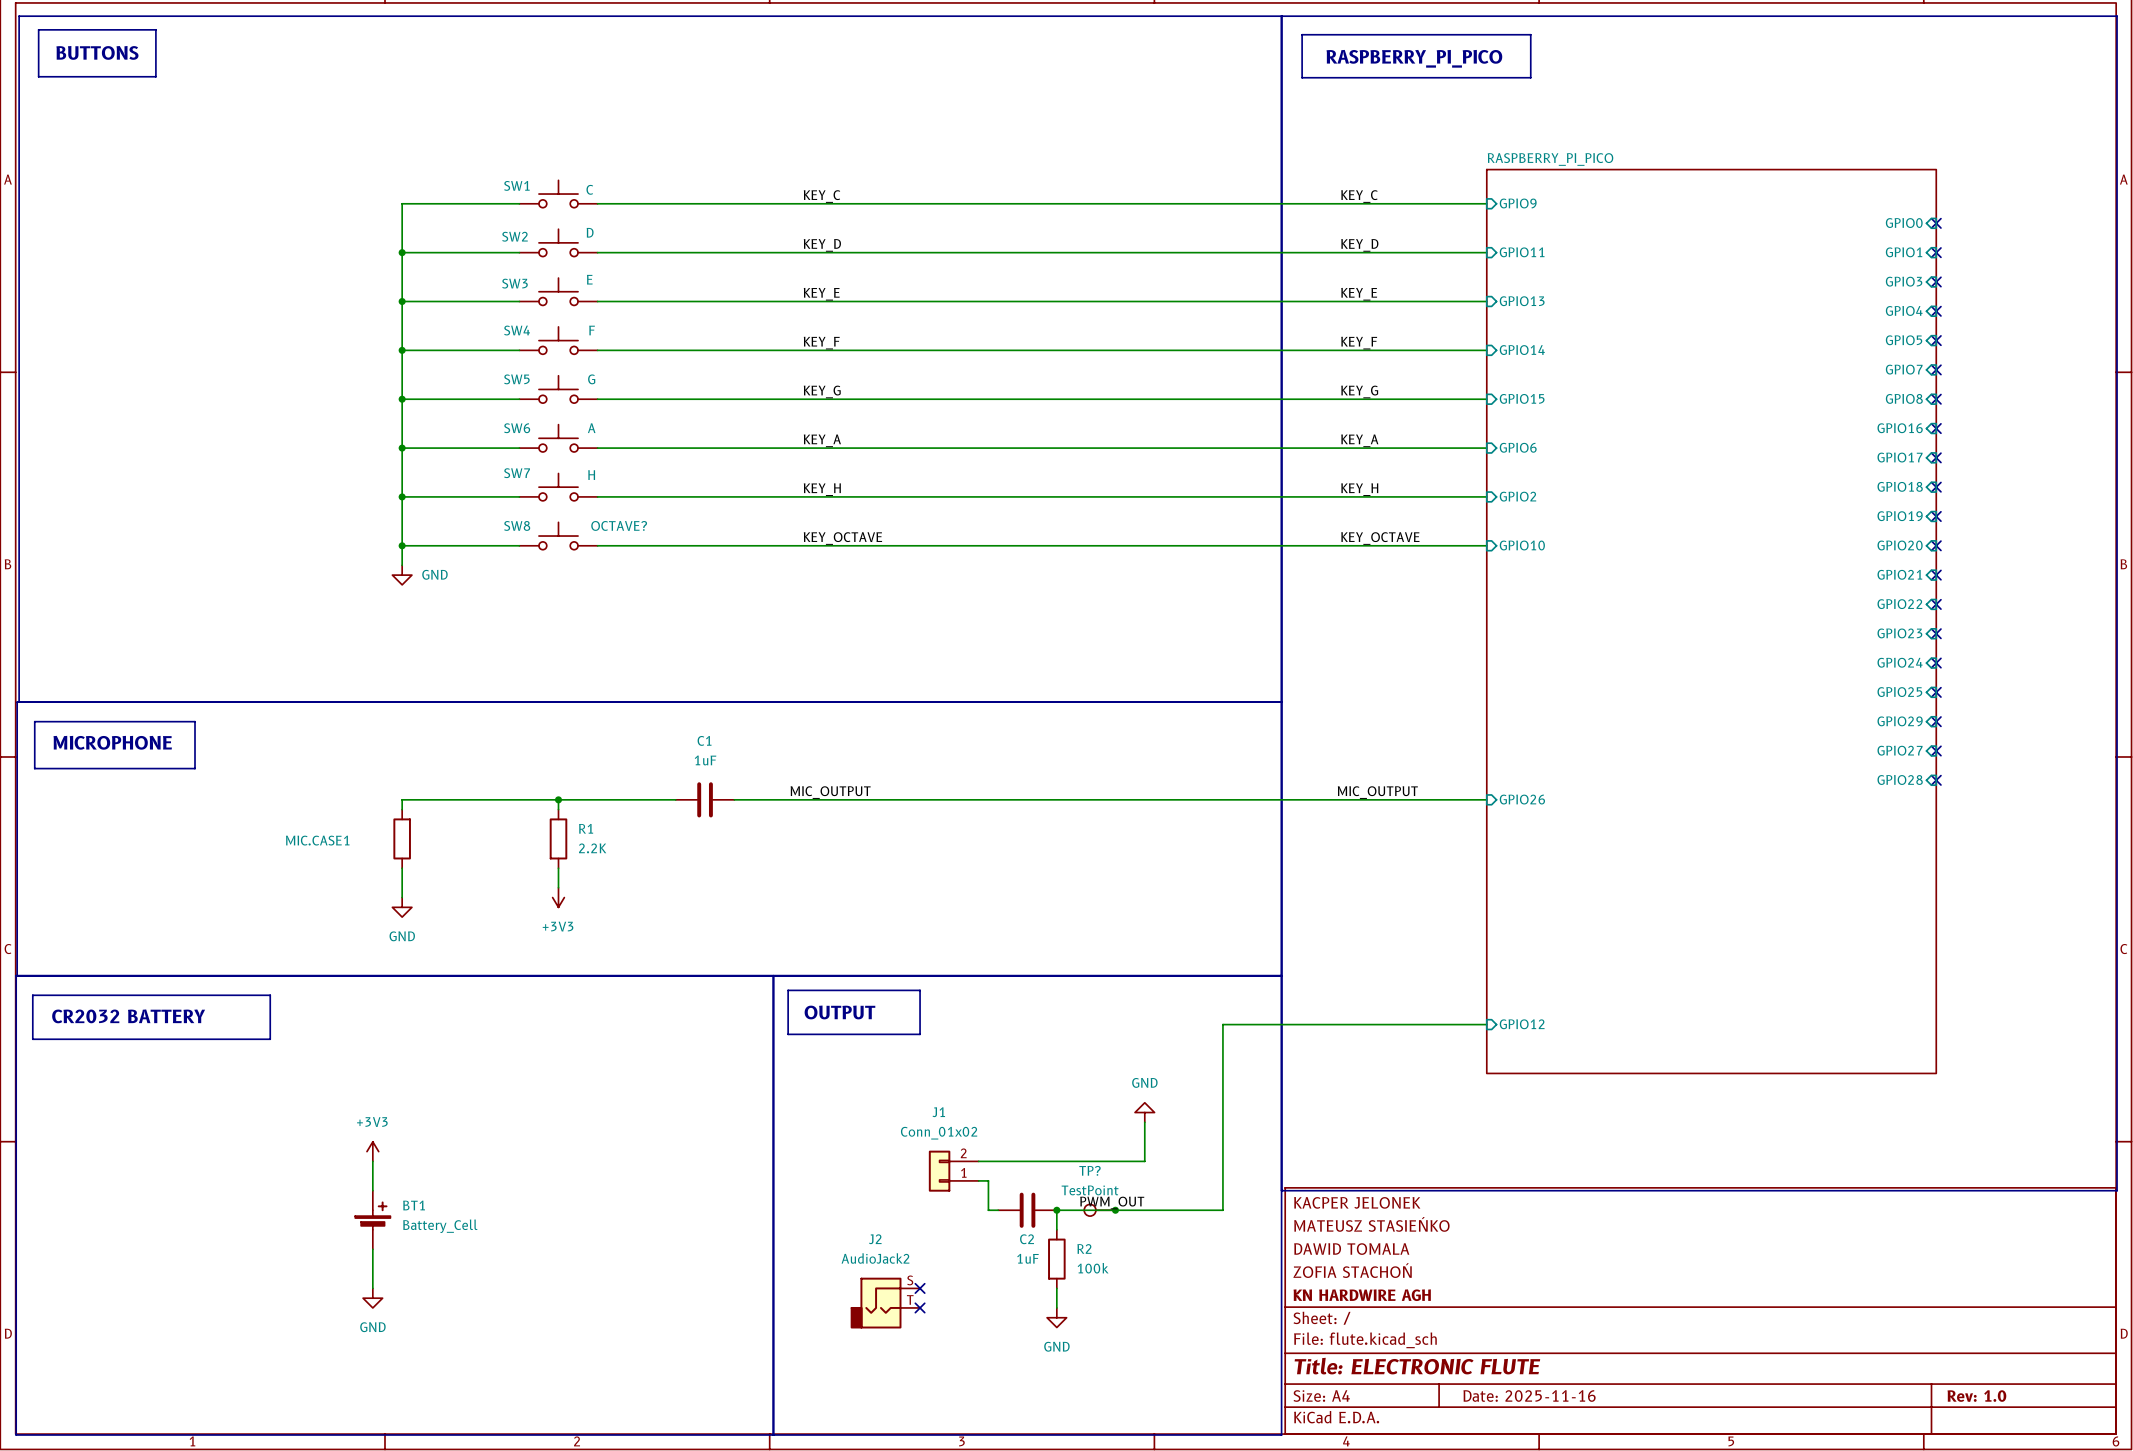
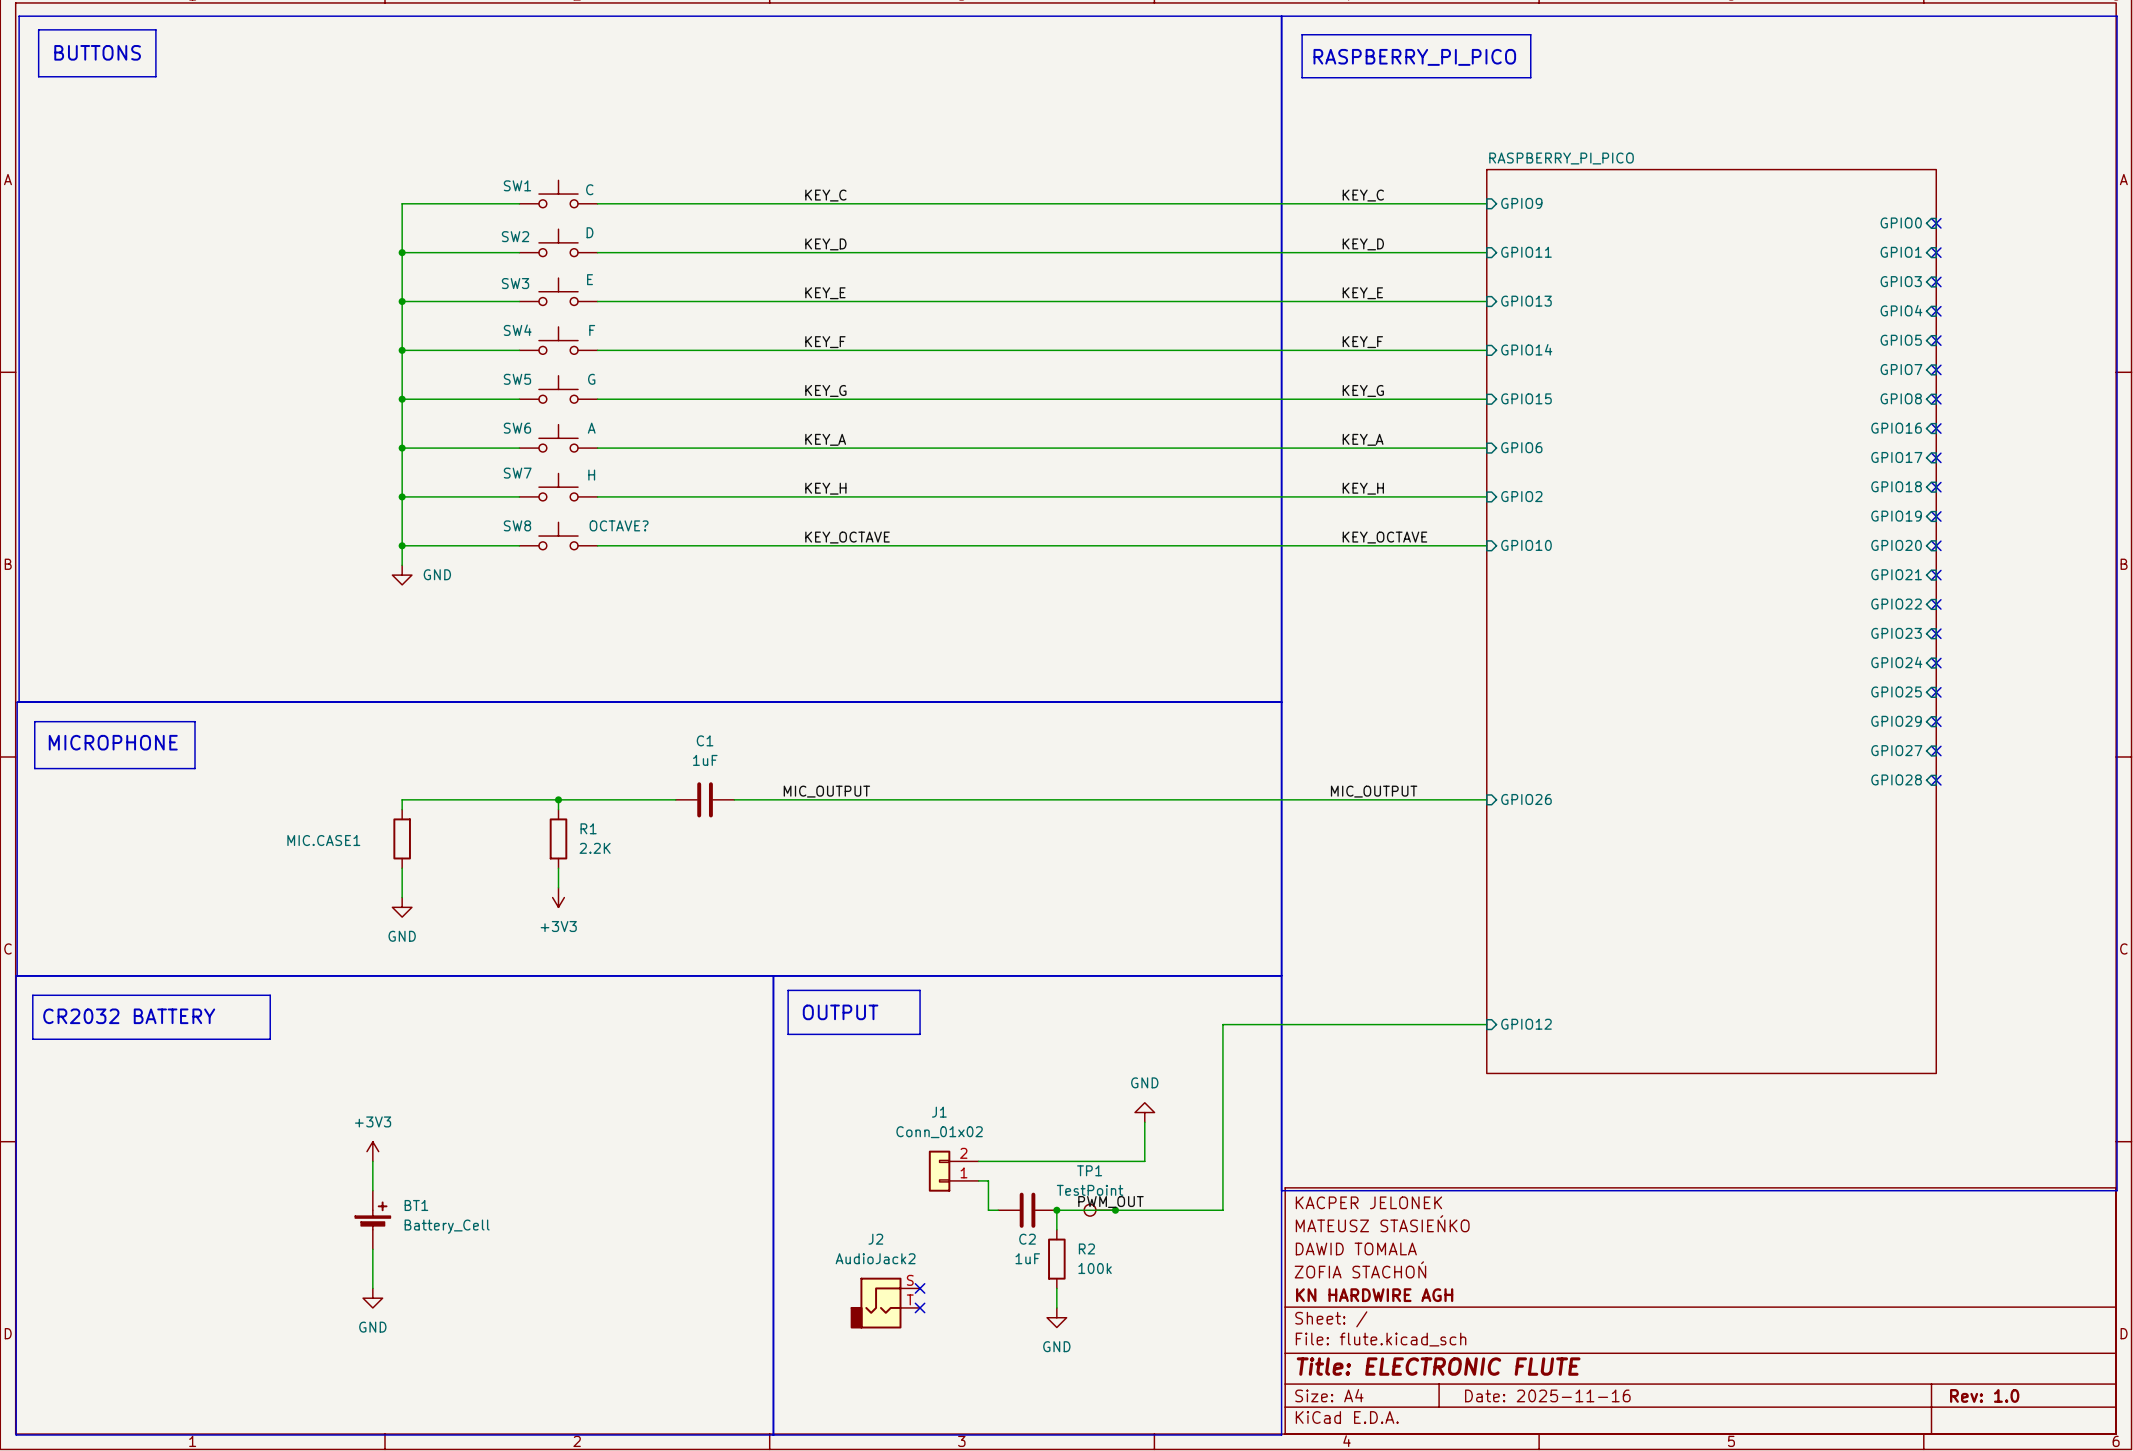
TP? name: TP? (1090, 1170) -> TP1 (1089, 1170)

